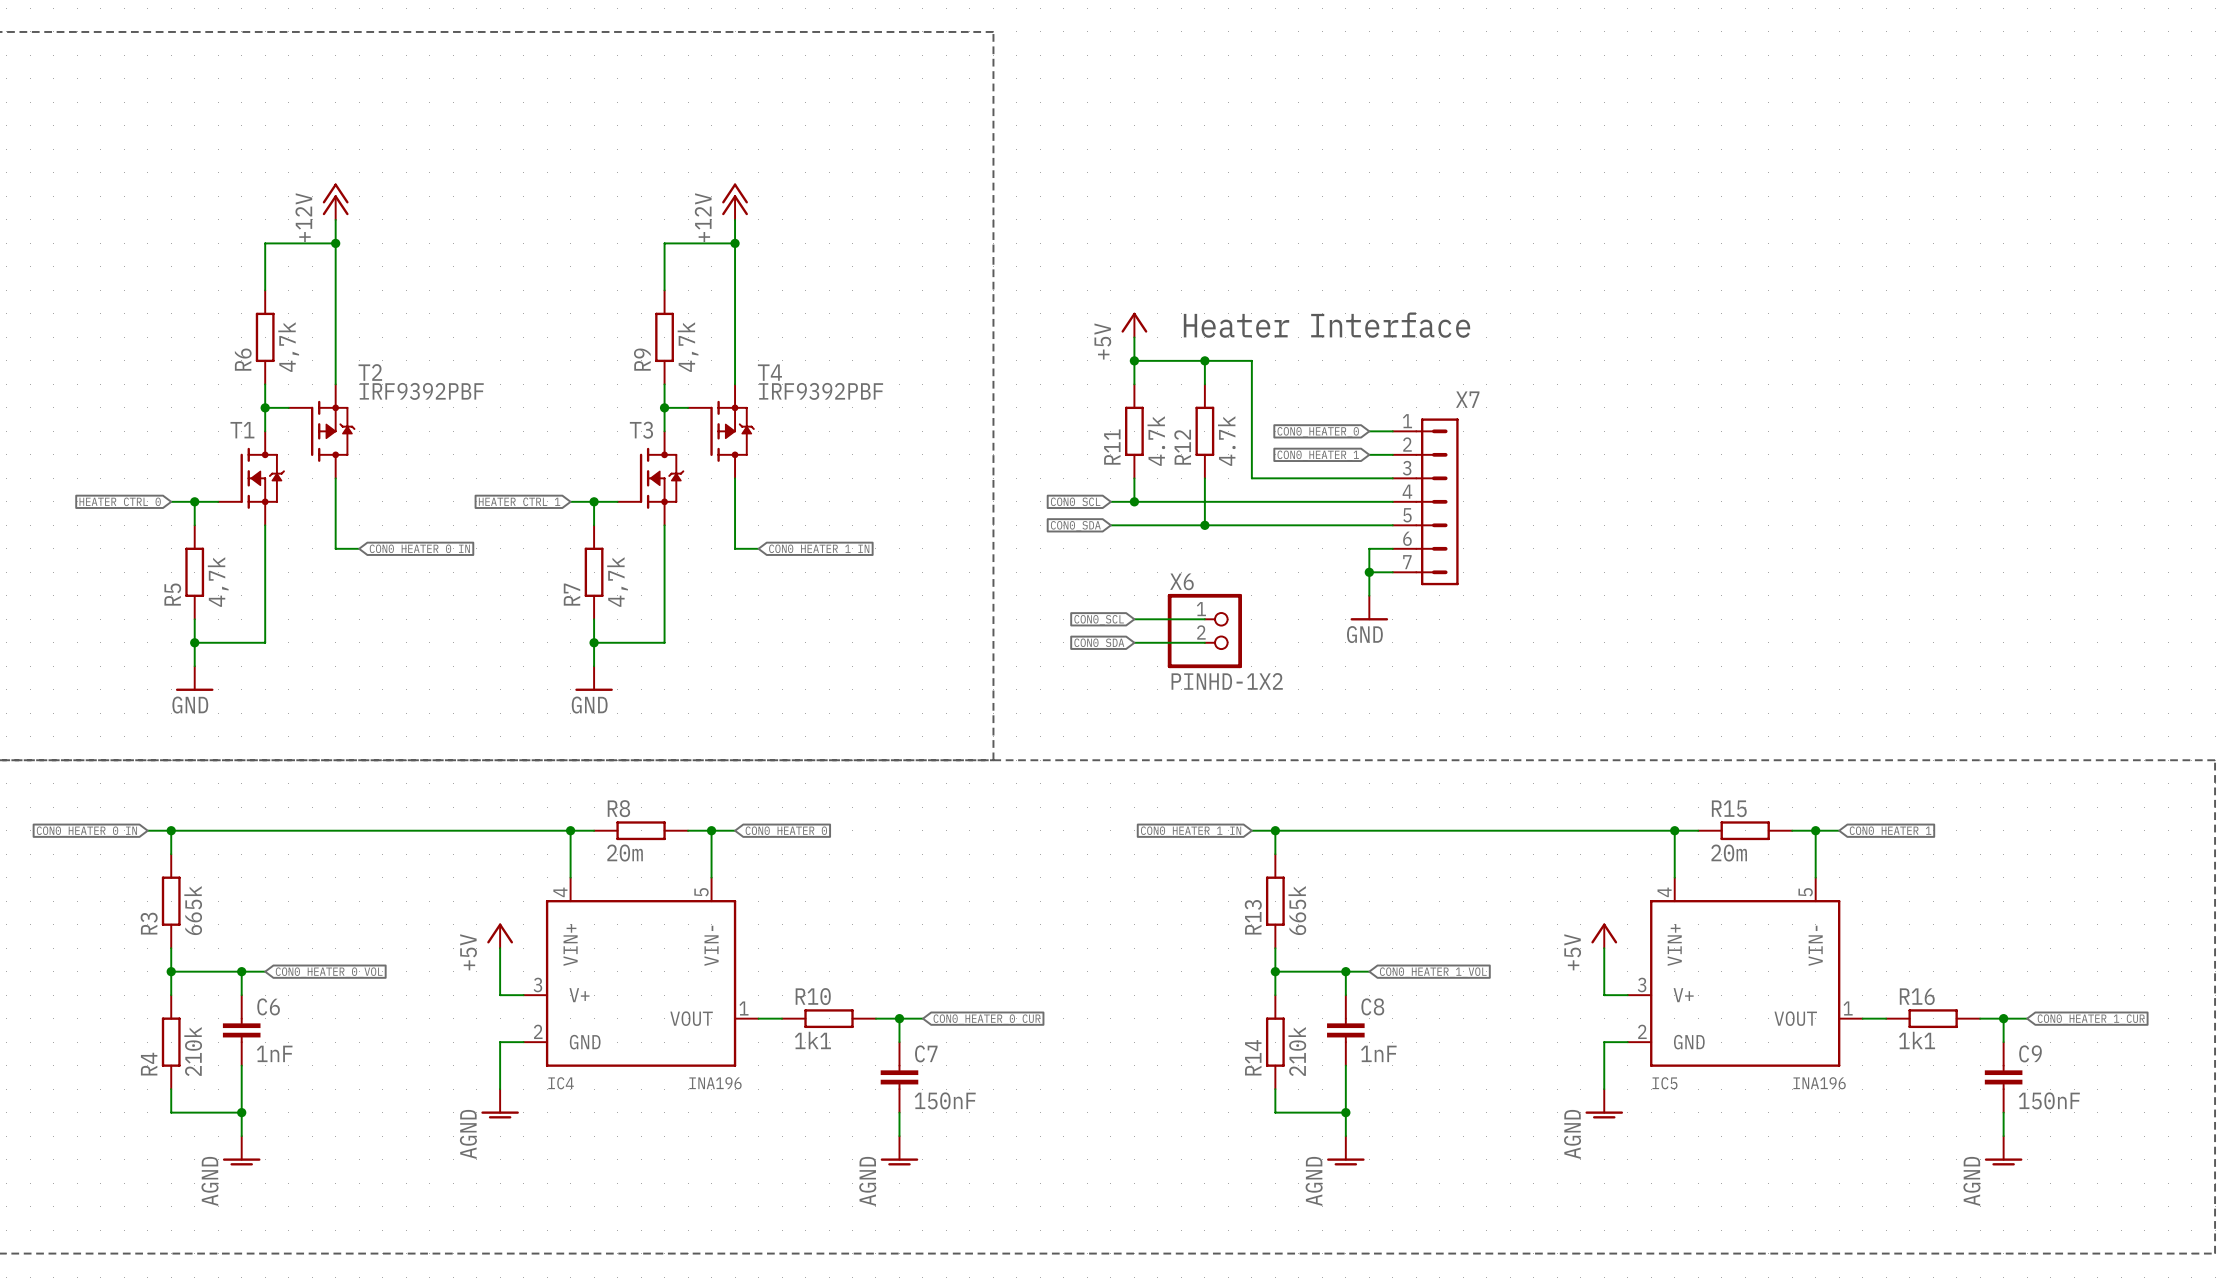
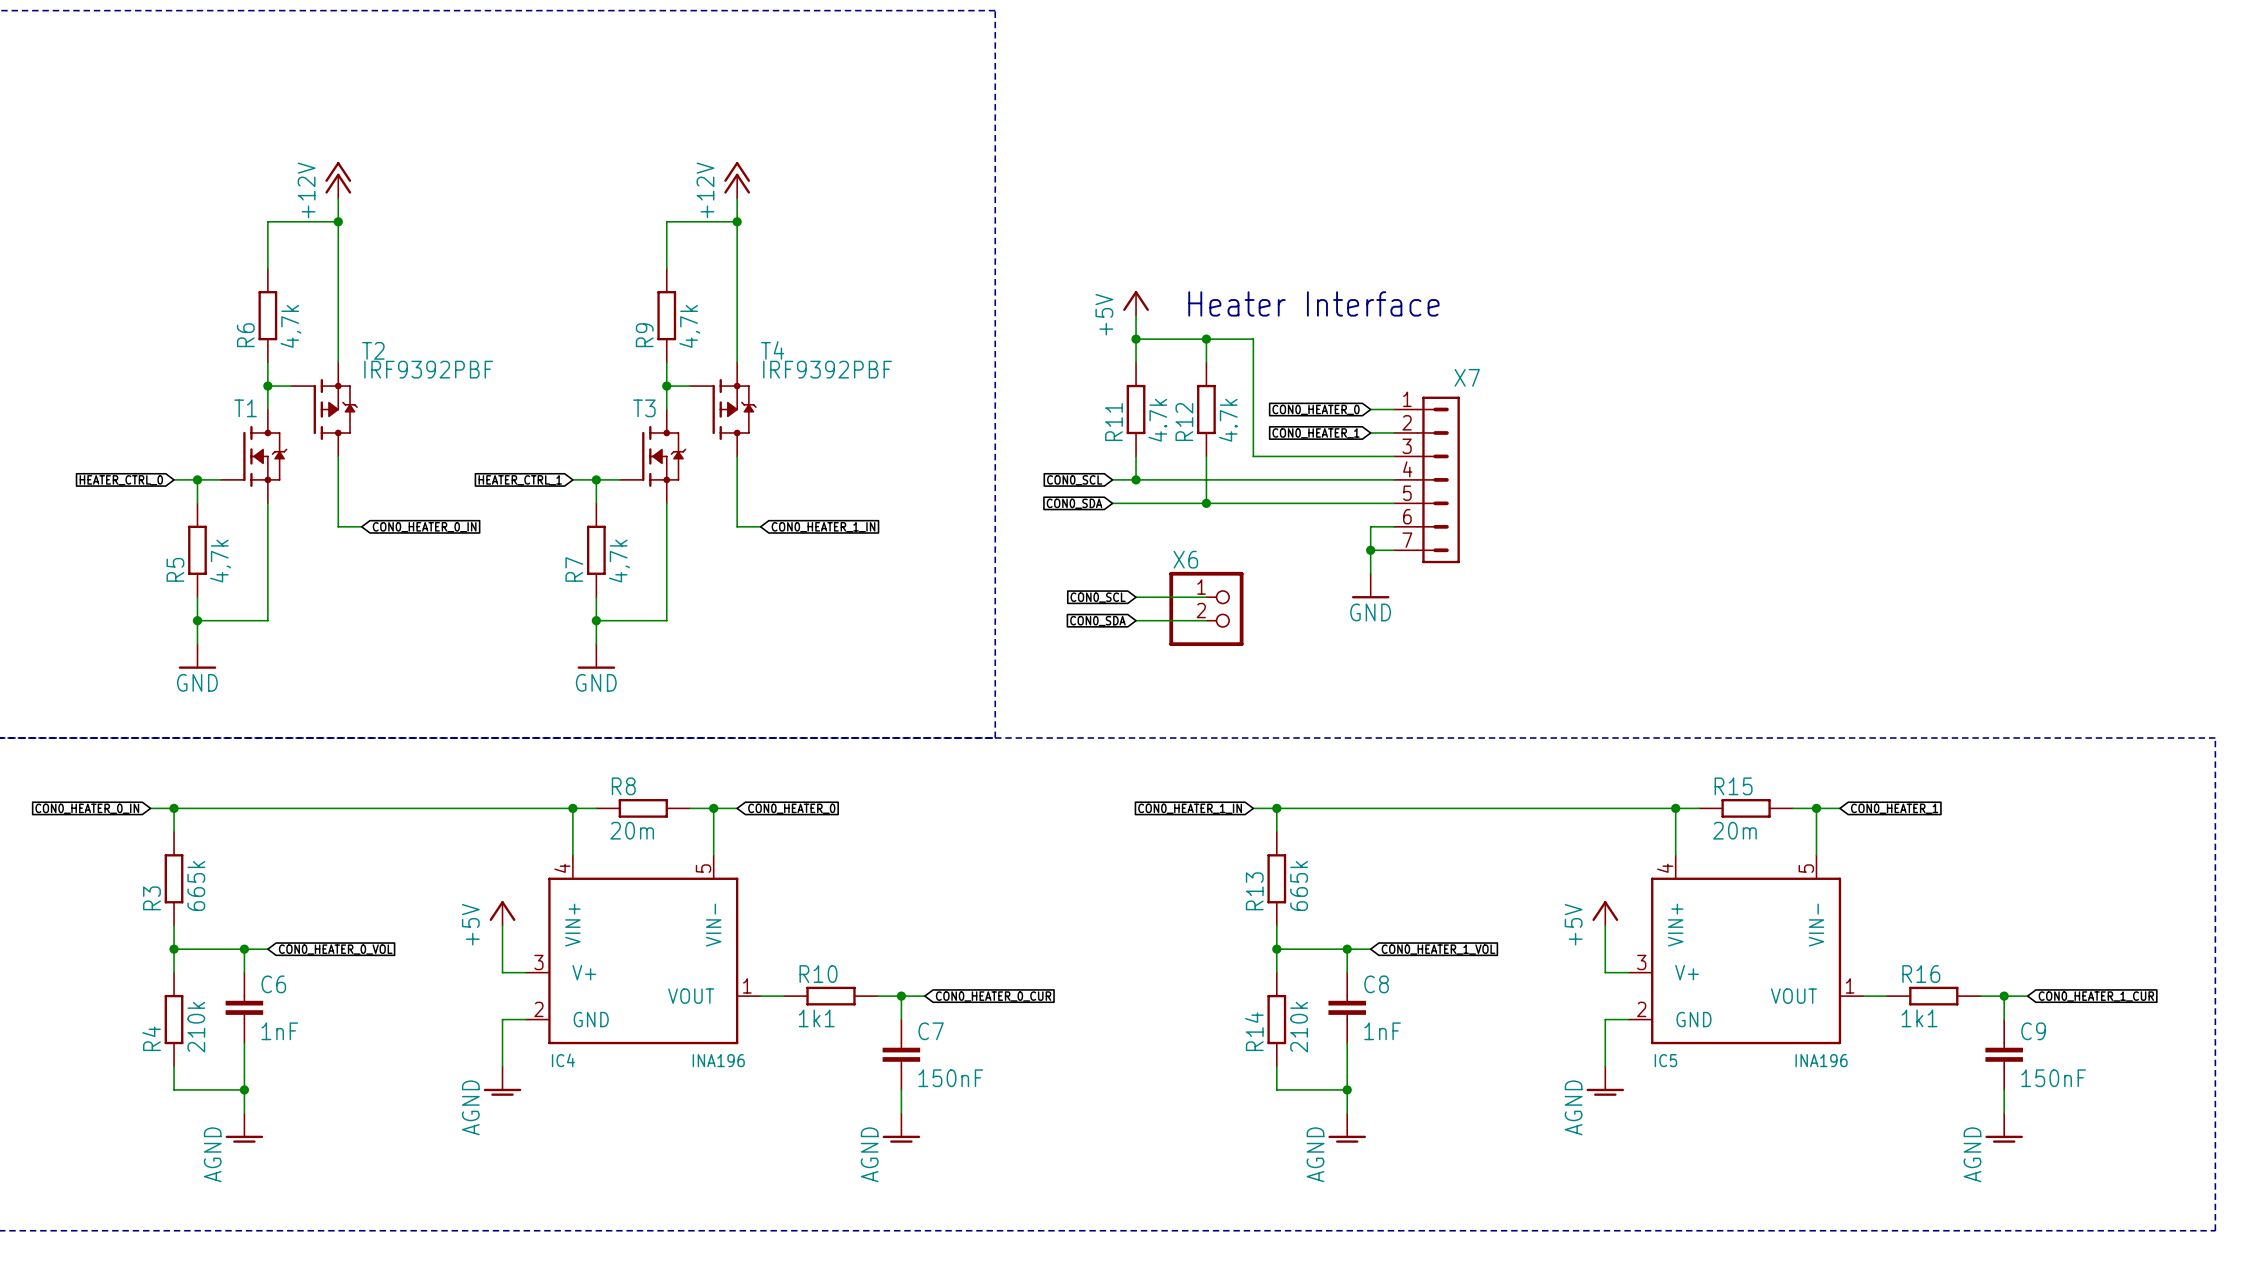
X6 value: PINHD-1X2 (1227, 681) -> none

